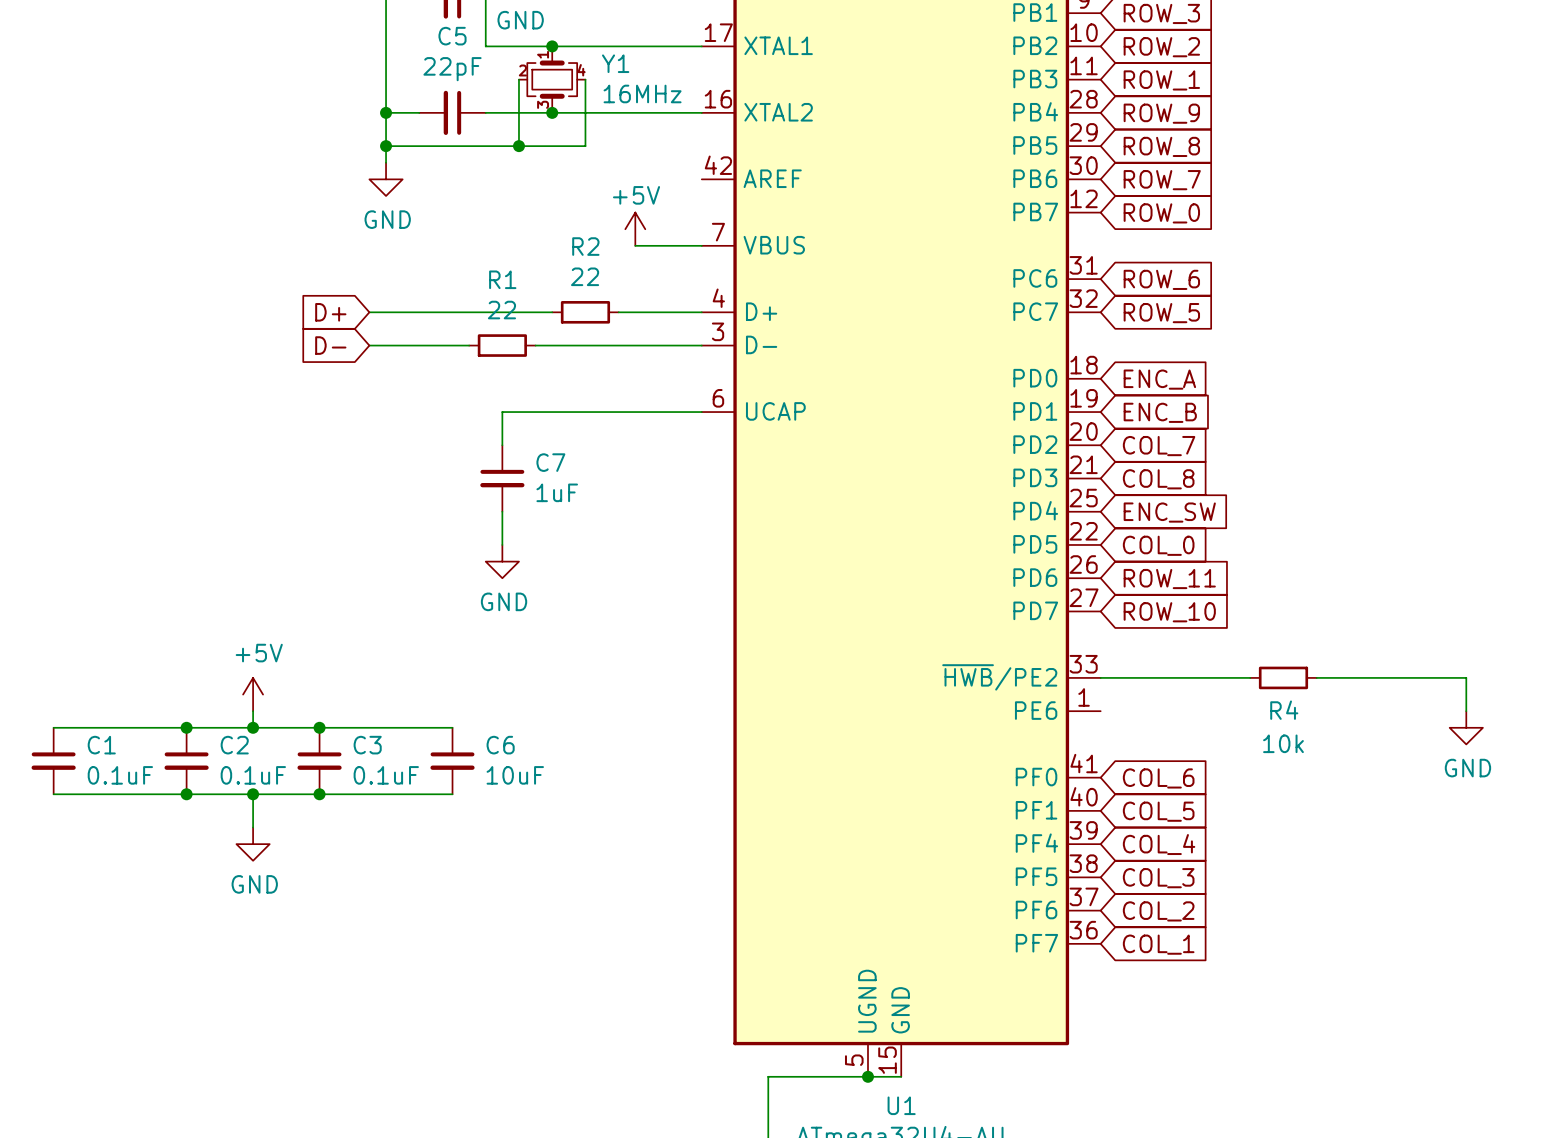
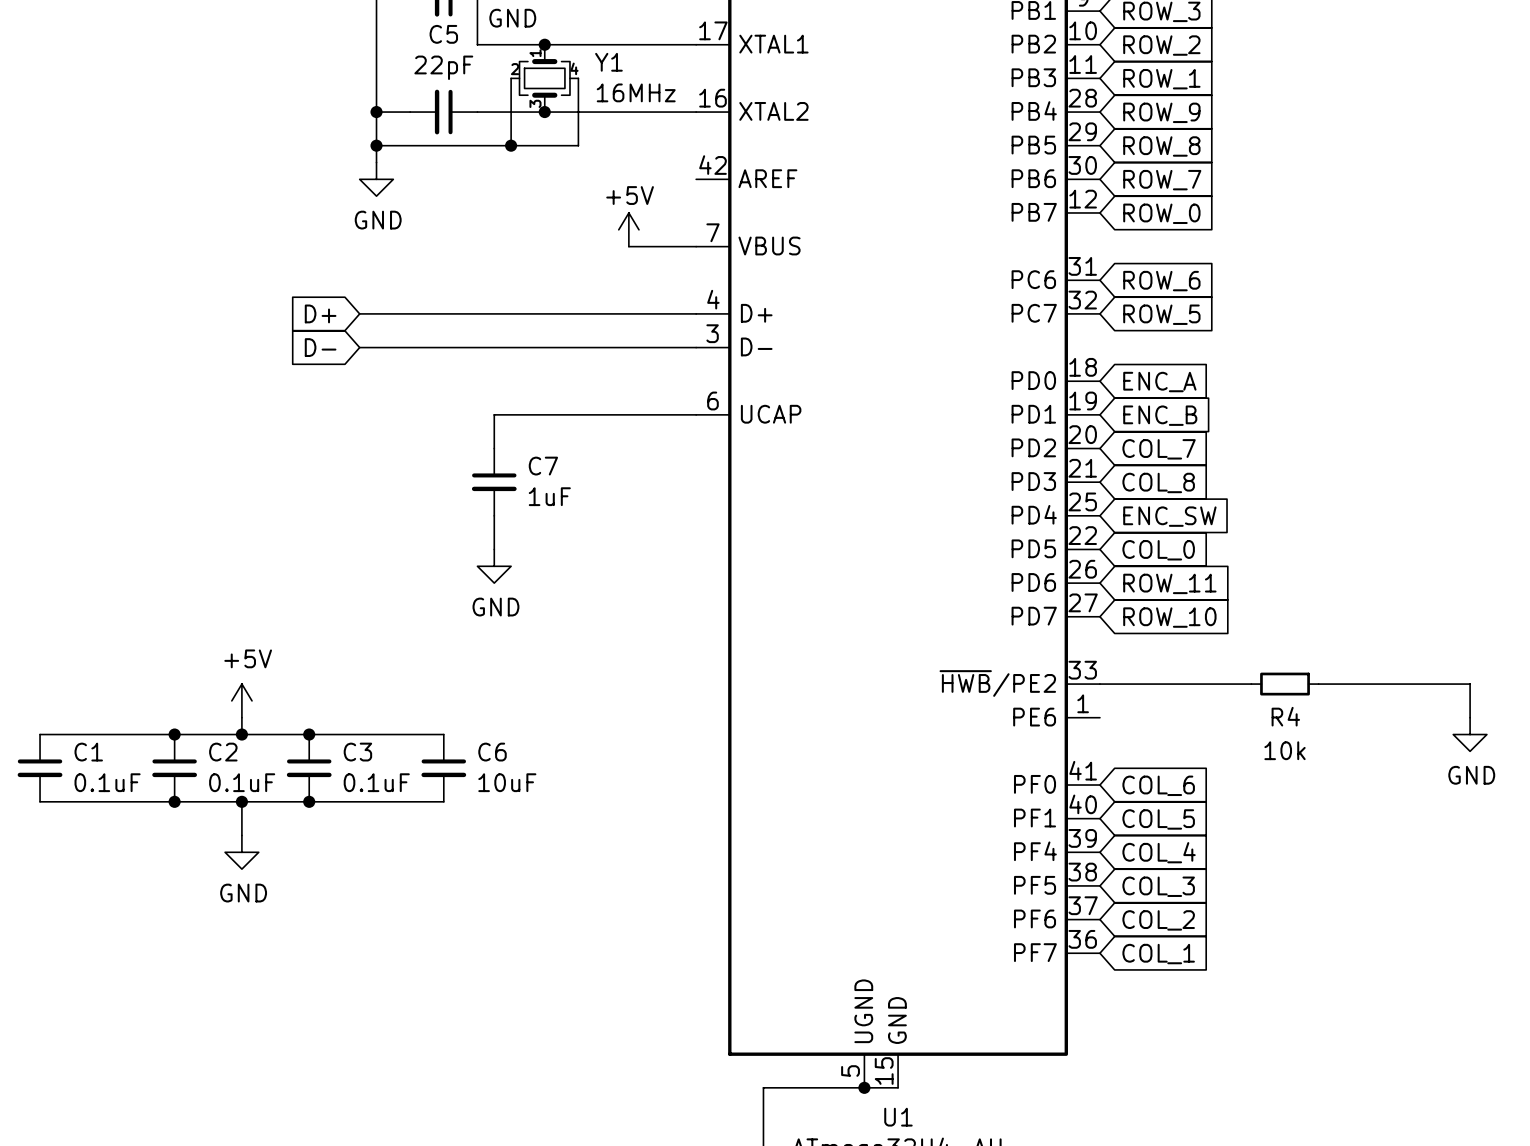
wire: none -> (544, 313) (612, 313)
R2: 22 (585, 312) -> none
wire: none -> (460, 347) (527, 347)
R1: 22 (502, 345) -> none

